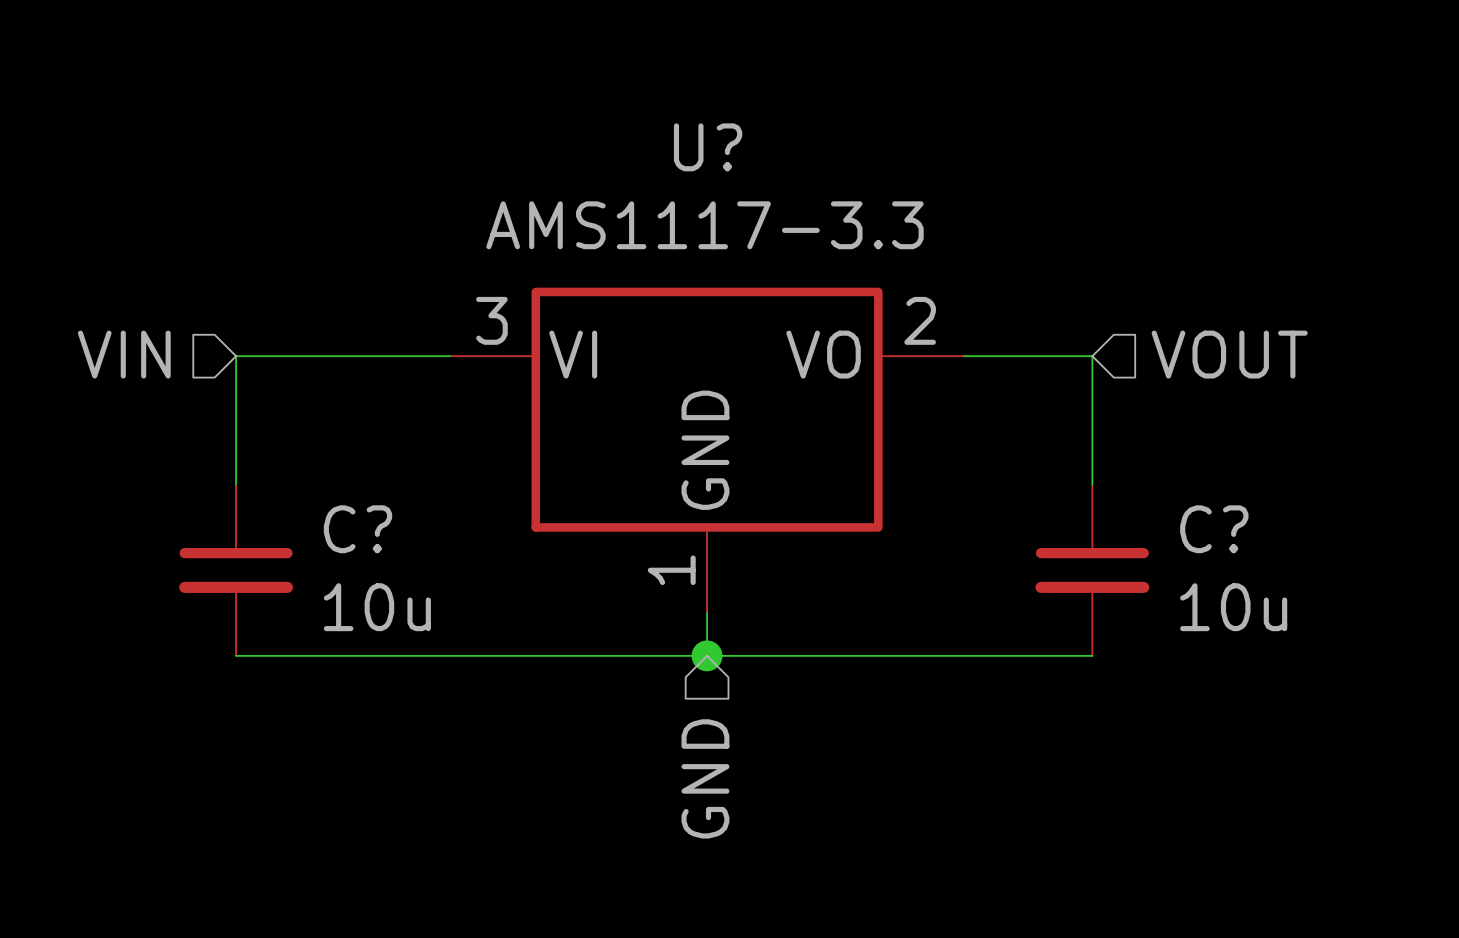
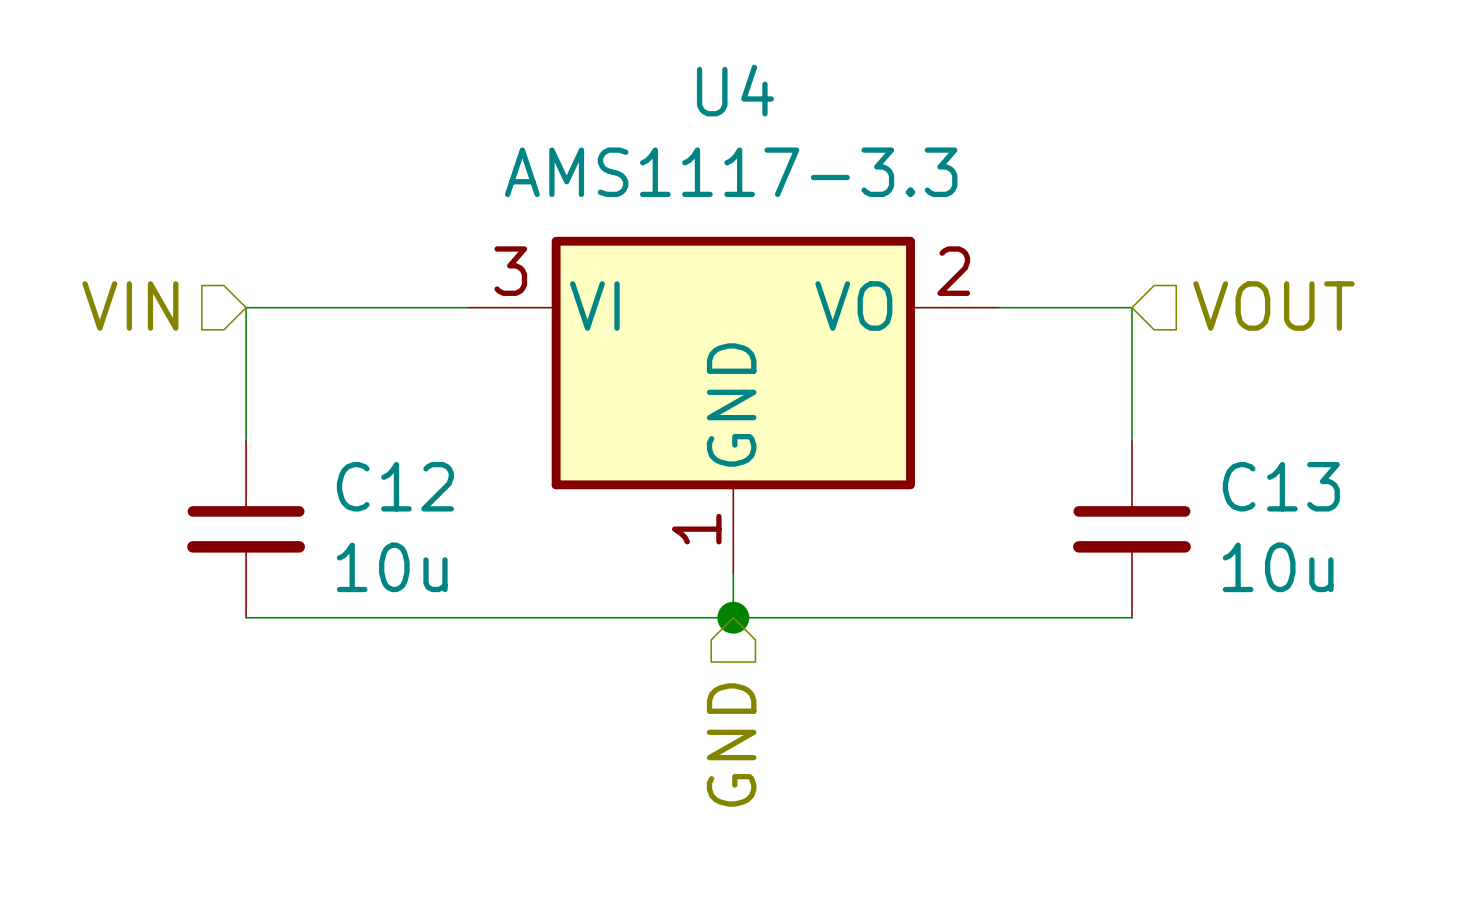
U? name: U? (708, 147) -> U4 (735, 90)
C? name: C? (358, 529) -> C12 (395, 486)
C? name: C? (1214, 529) -> C13 (1281, 486)

